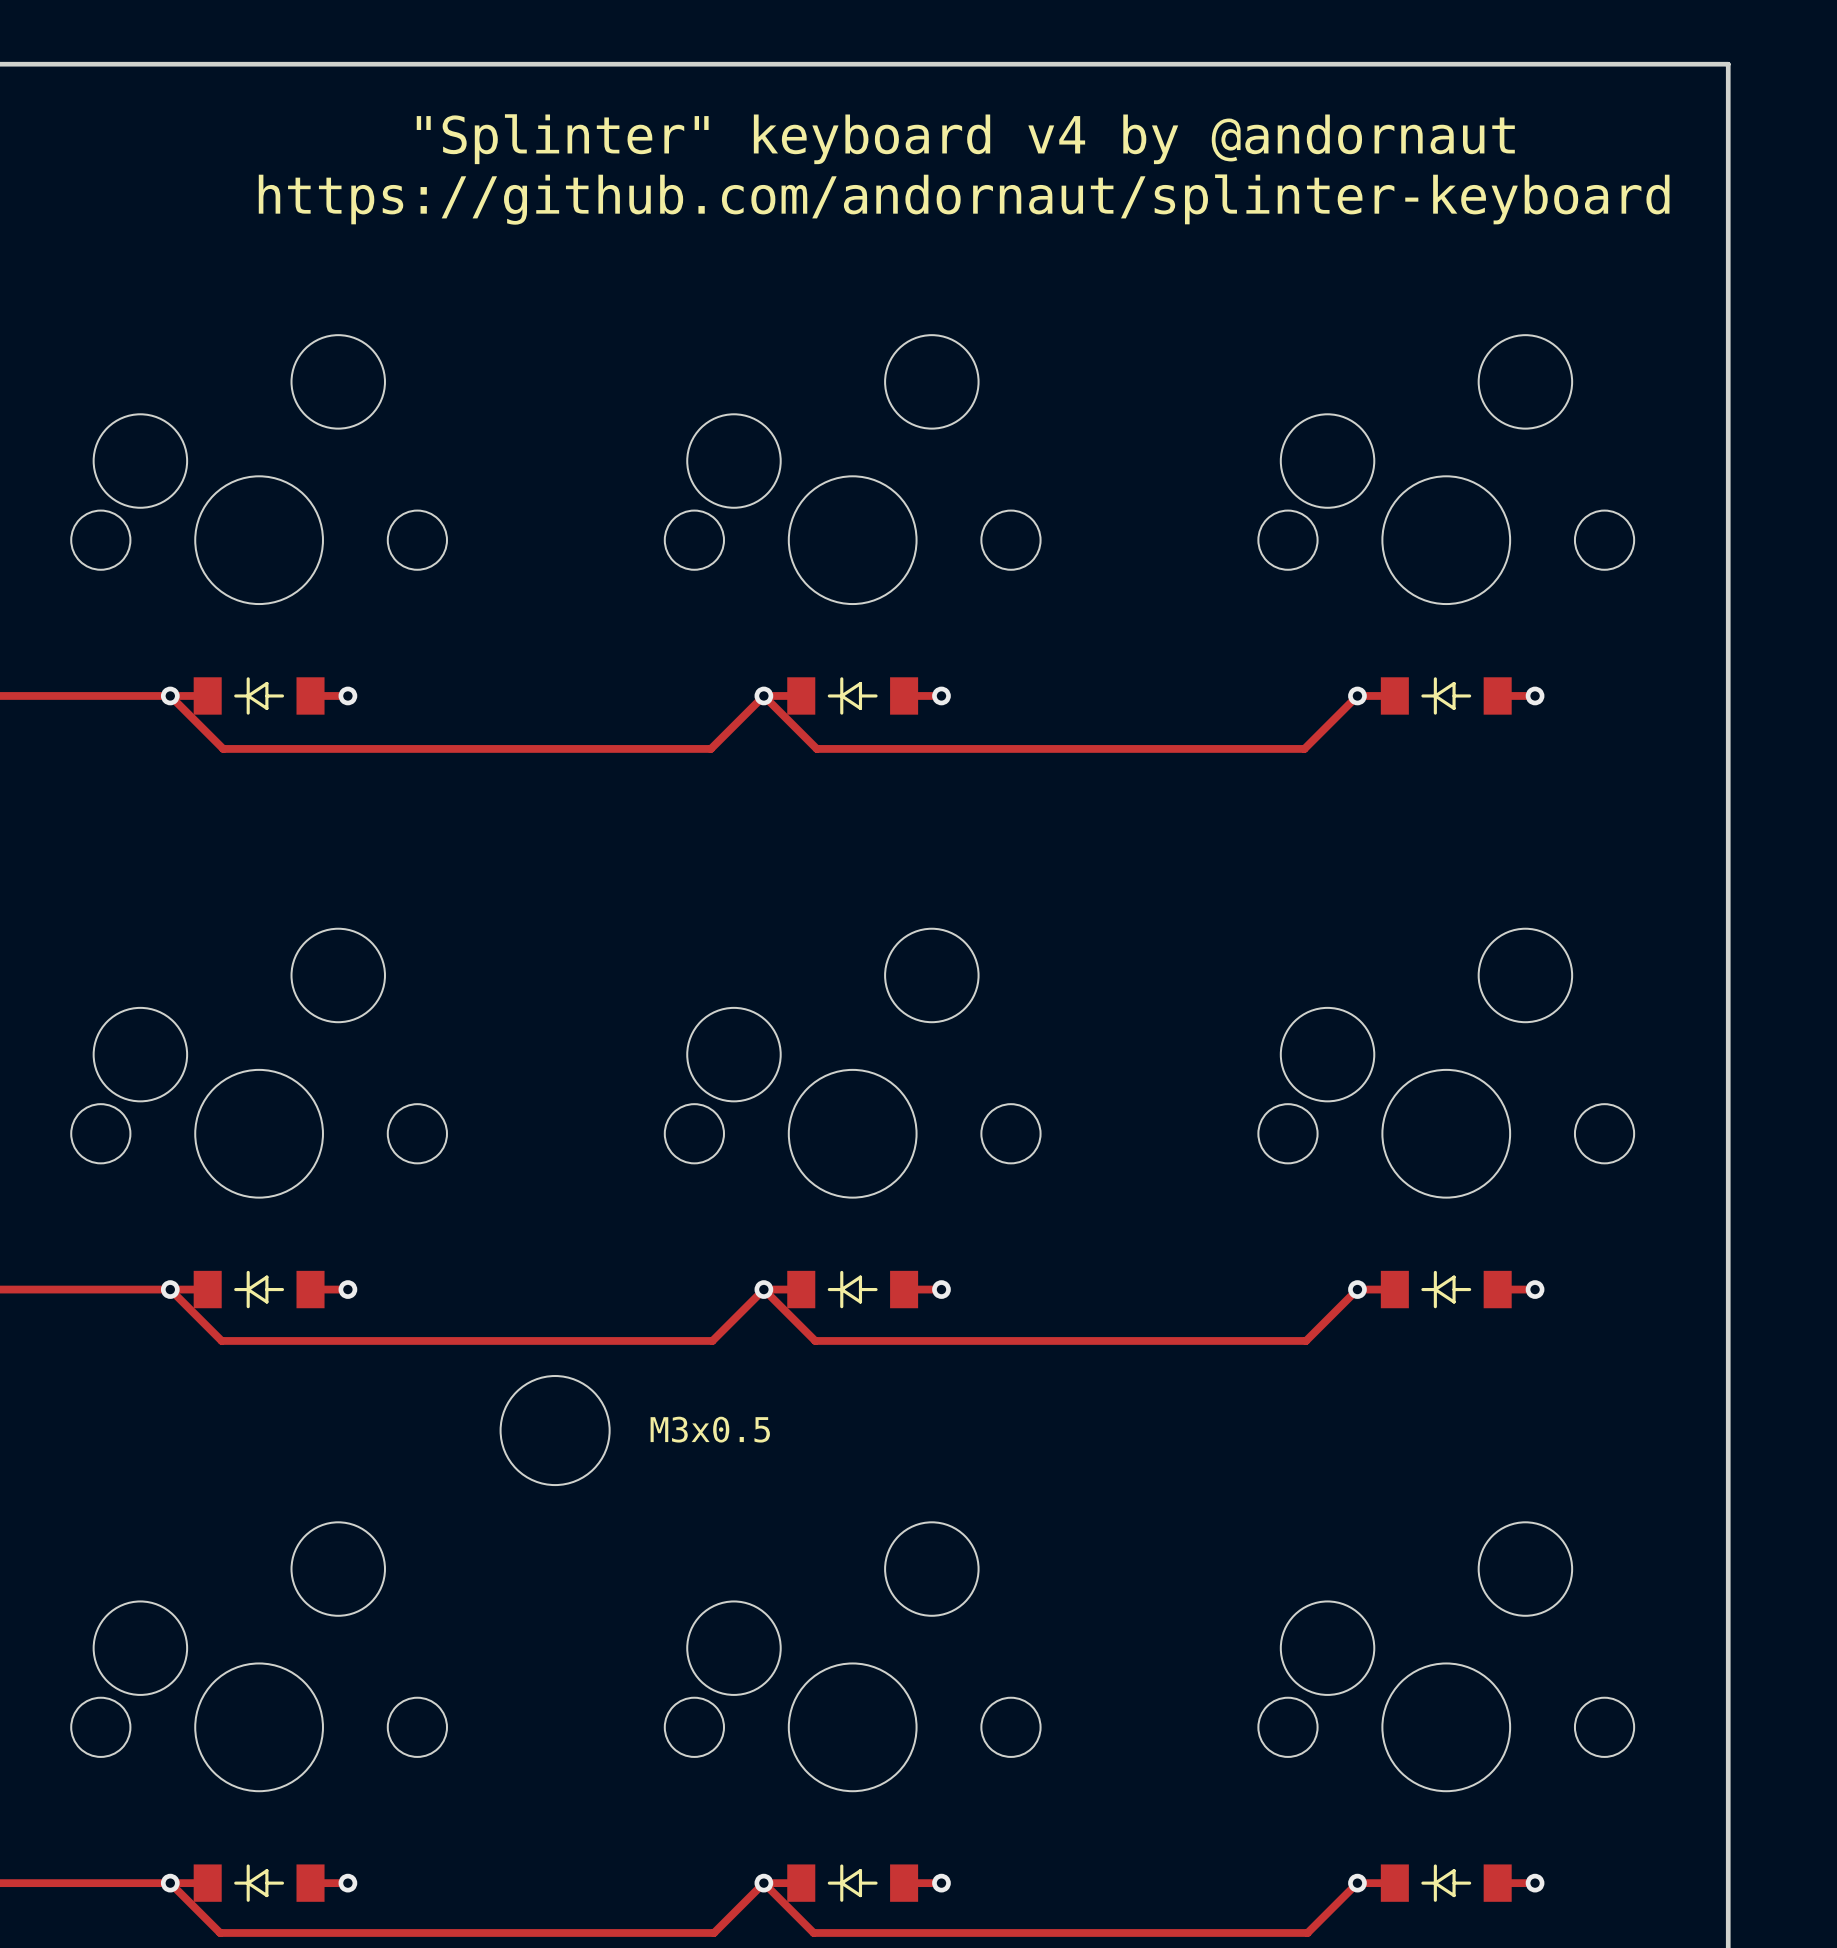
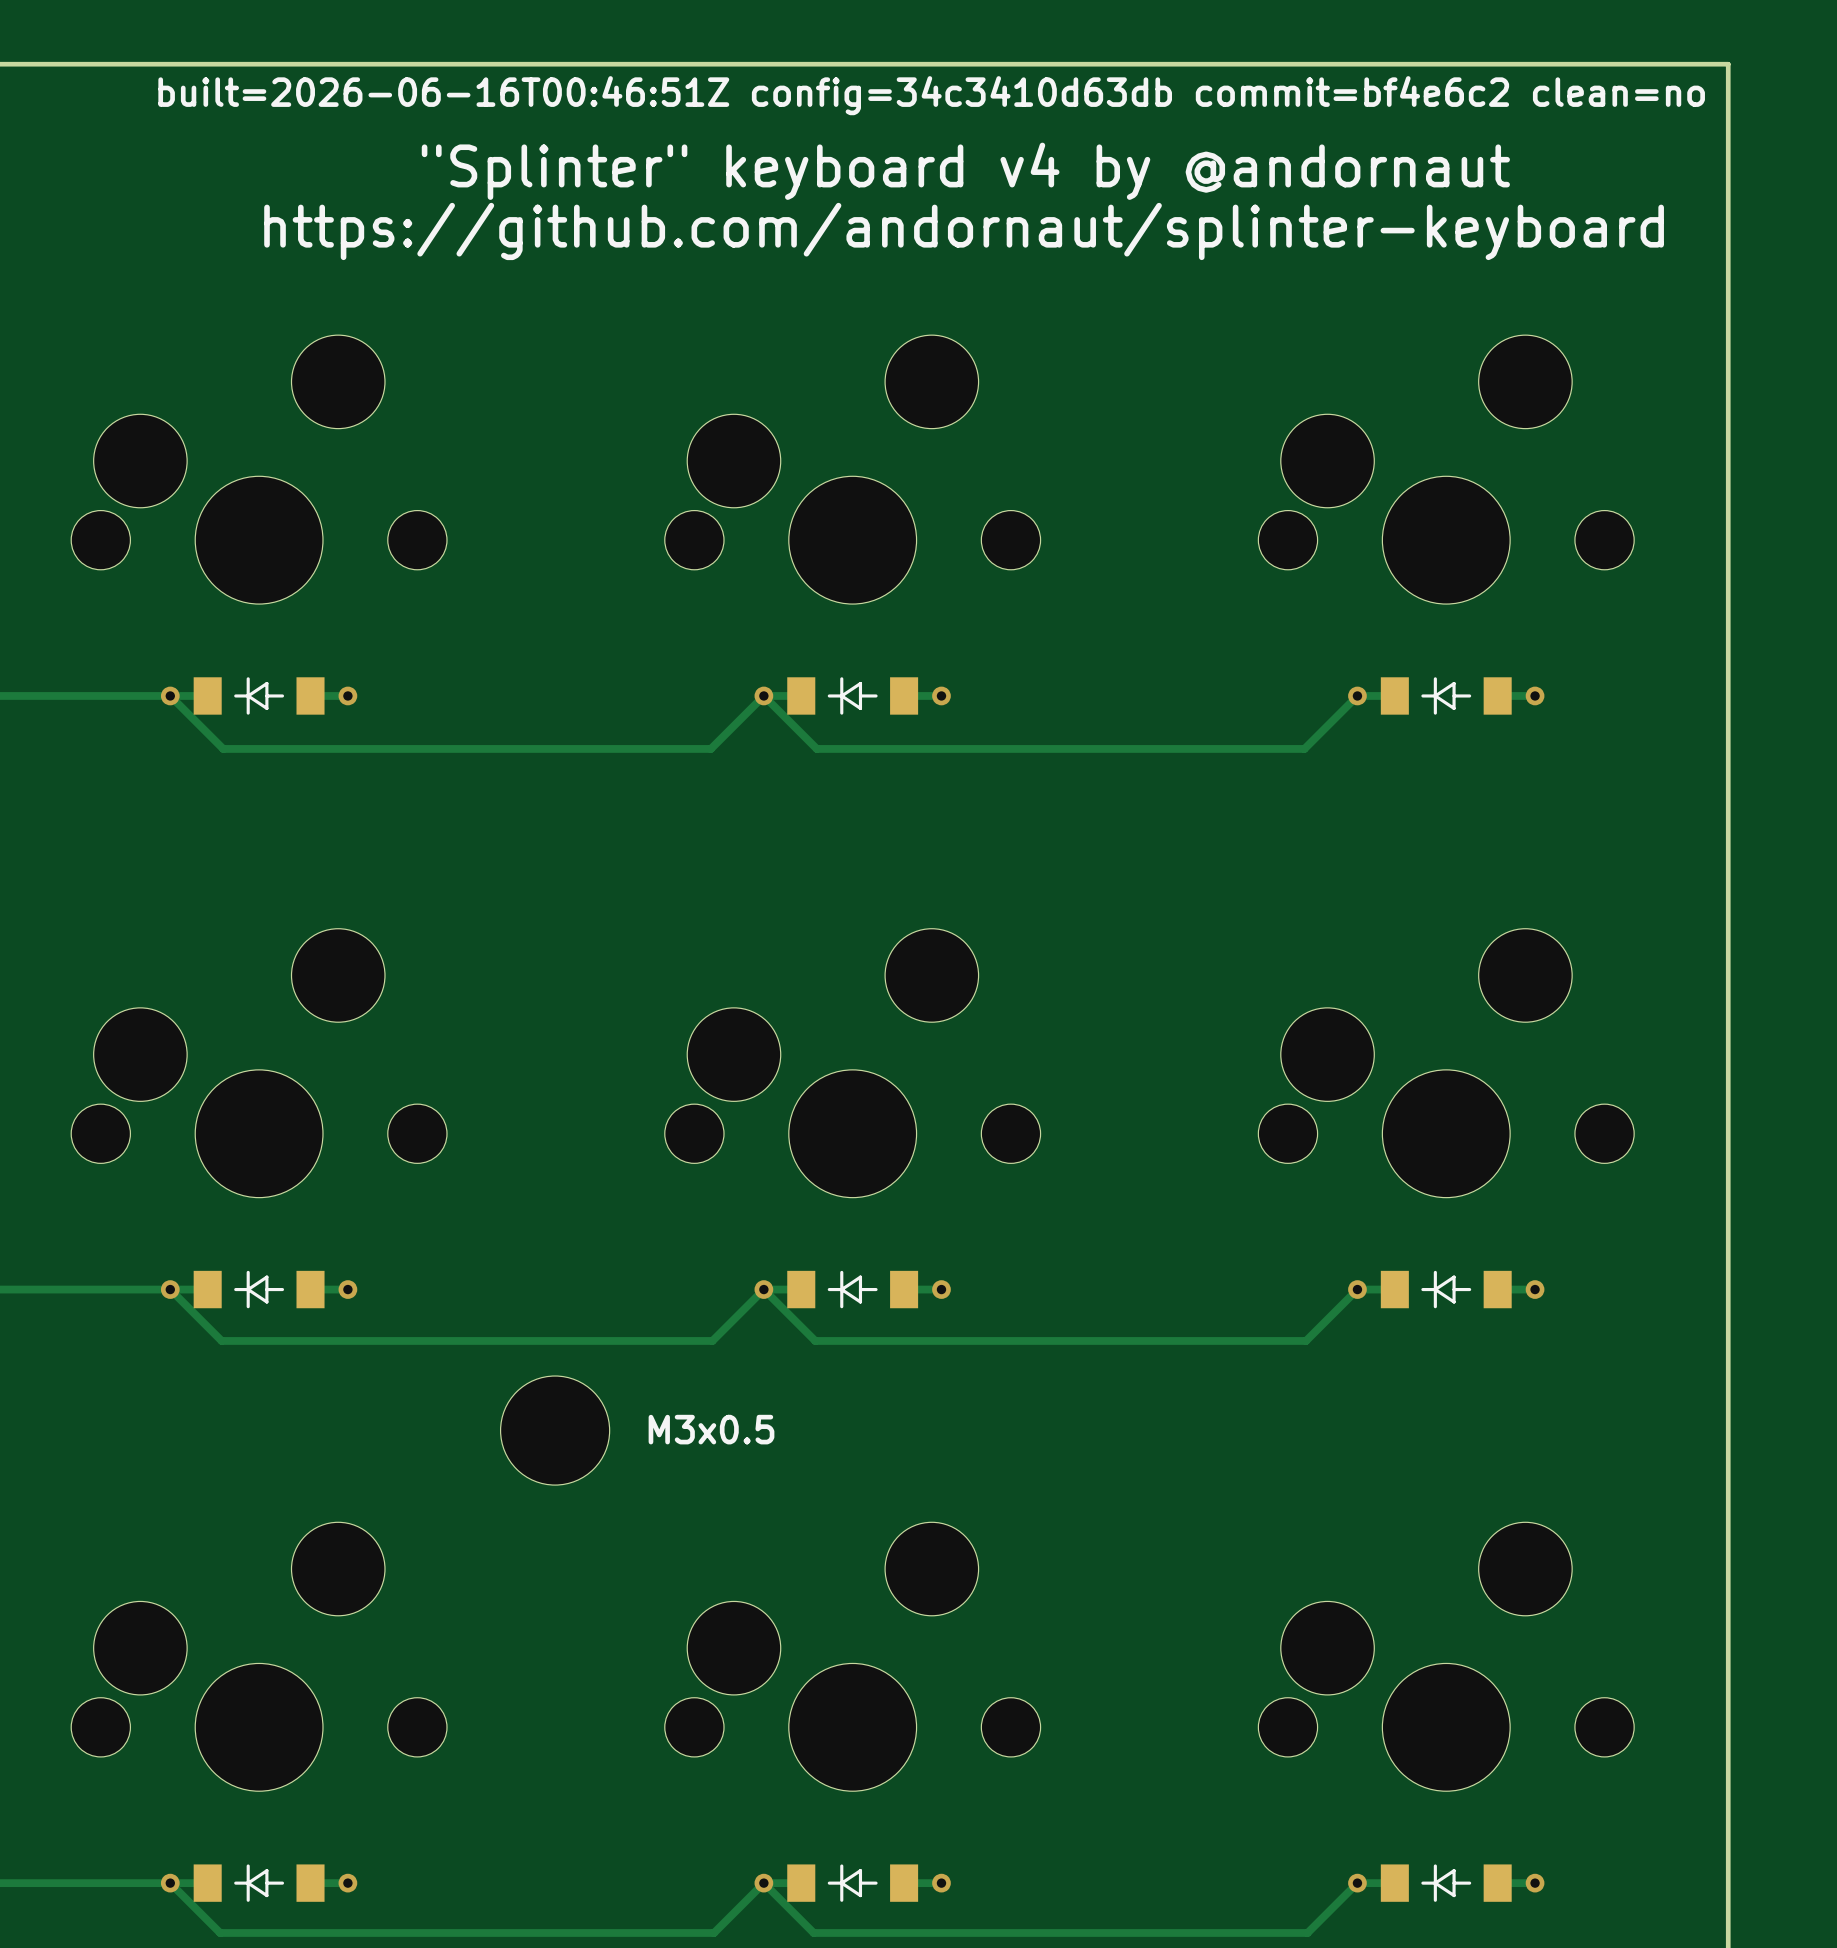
text: none -> built=2026-06-16T00:46:51Z config=34c3410d63db commit=bf4e6c2 clean=no (931, 95)
text position: "Splinter" keyboard v4 by @andornaut (965, 139) -> "Splinter" keyboard v4 by @andornaut (965, 171)
text position: https://github.com/andornaut/splinter-keyboard (964, 199) -> https://github.com/andornaut/splinter-keyboard (964, 231)

